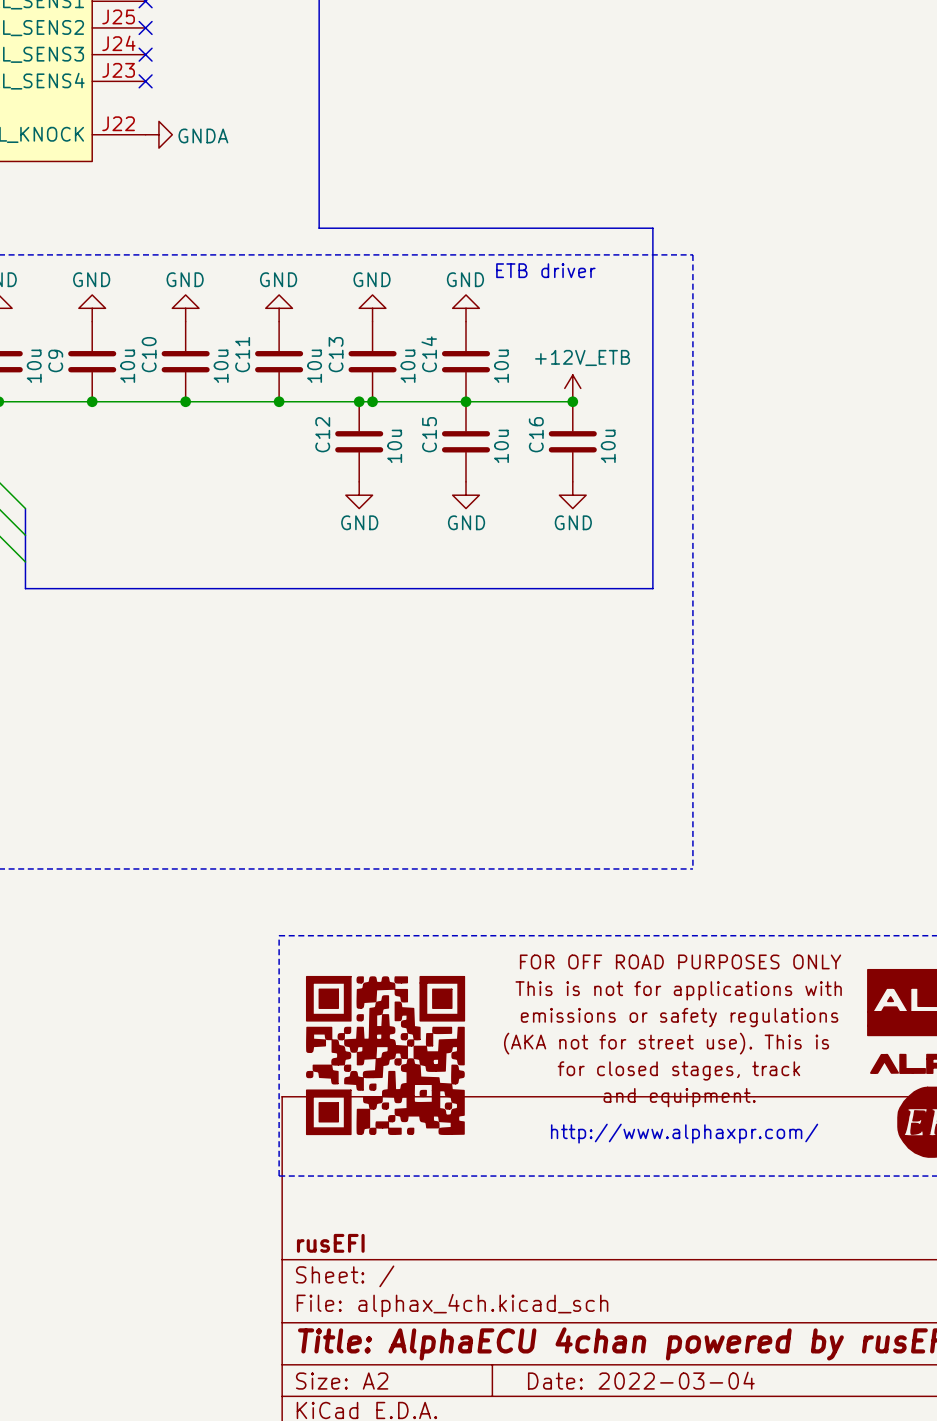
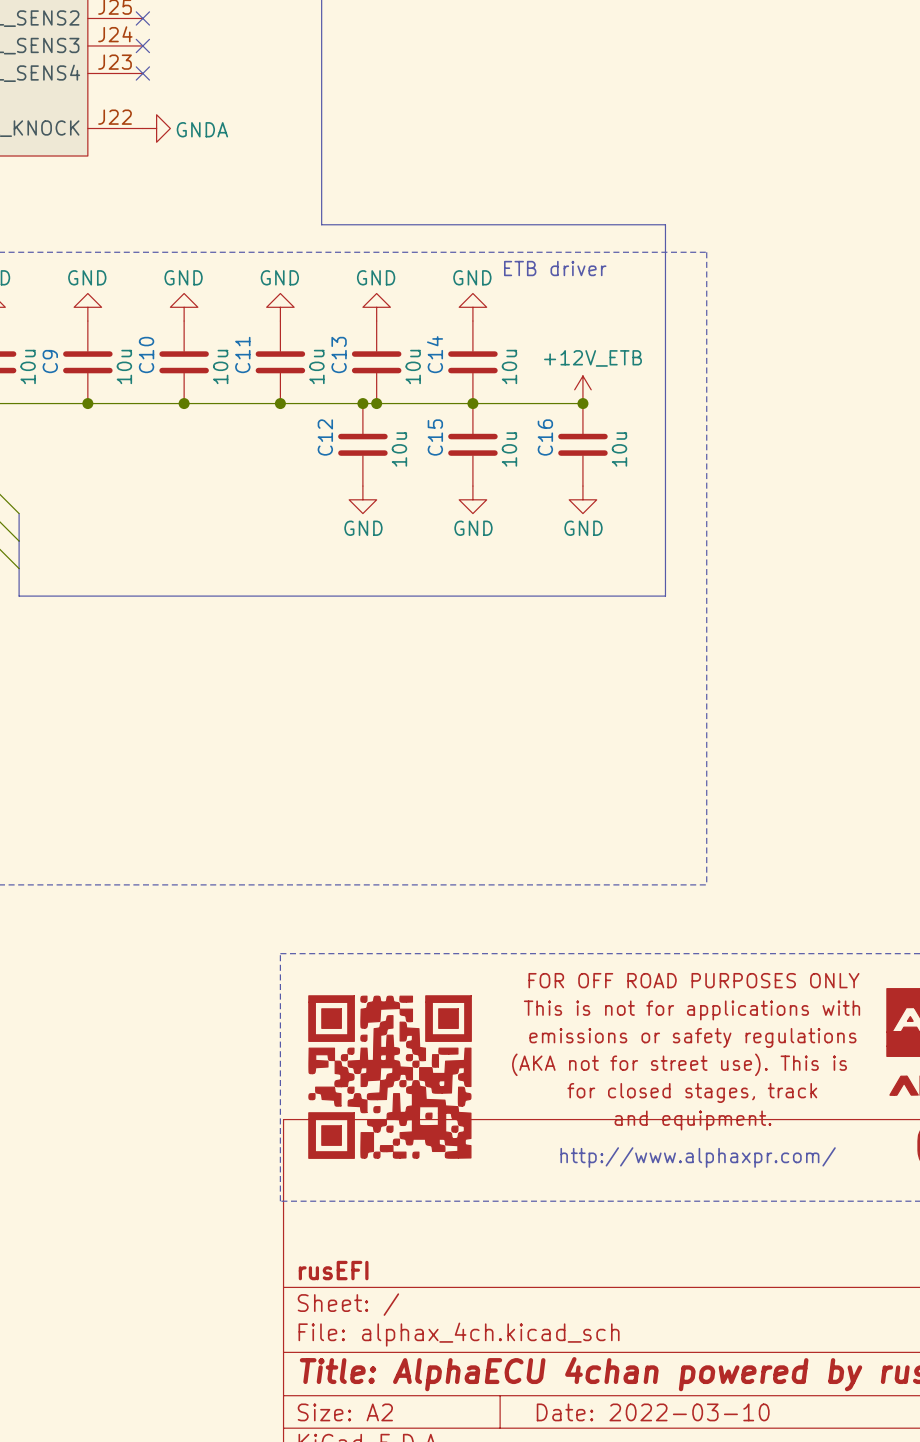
title block: Date: 2022-03-04 (641, 1380) -> Date: 2022-03-10 (653, 1412)

